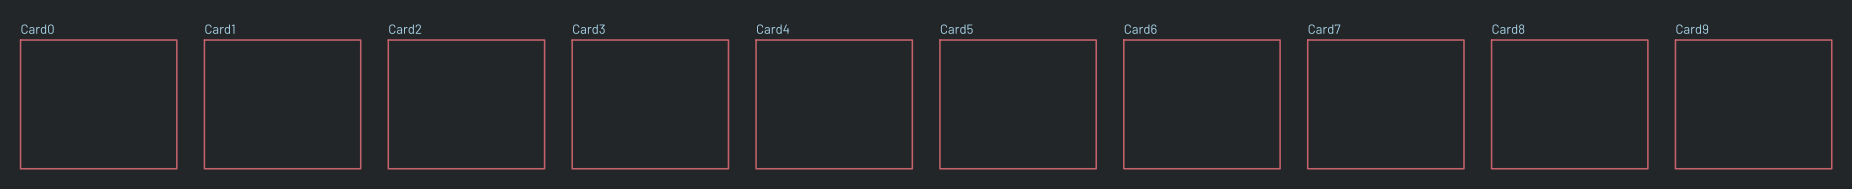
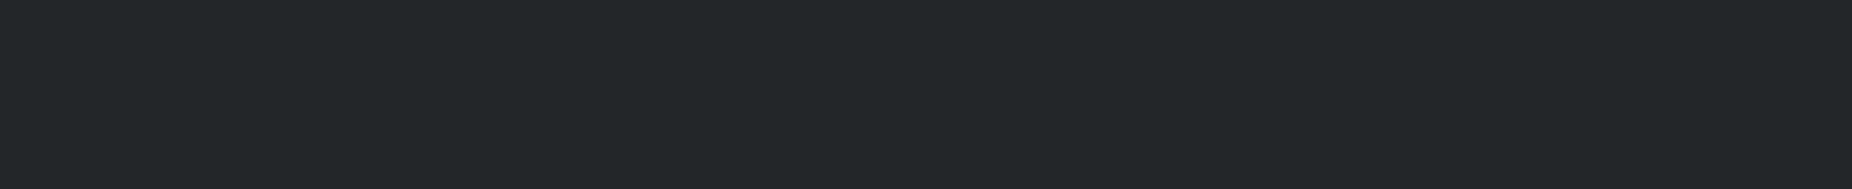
sheet Card0: (98, 104) -> none
sheet Card1: (282, 104) -> none
sheet Card2: (466, 104) -> none
sheet Card3: (650, 104) -> none
sheet Card4: (834, 104) -> none
sheet Card5: (1018, 104) -> none
sheet Card6: (1201, 104) -> none
sheet Card7: (1385, 104) -> none
sheet Card8: (1569, 104) -> none
sheet Card9: (1753, 104) -> none

